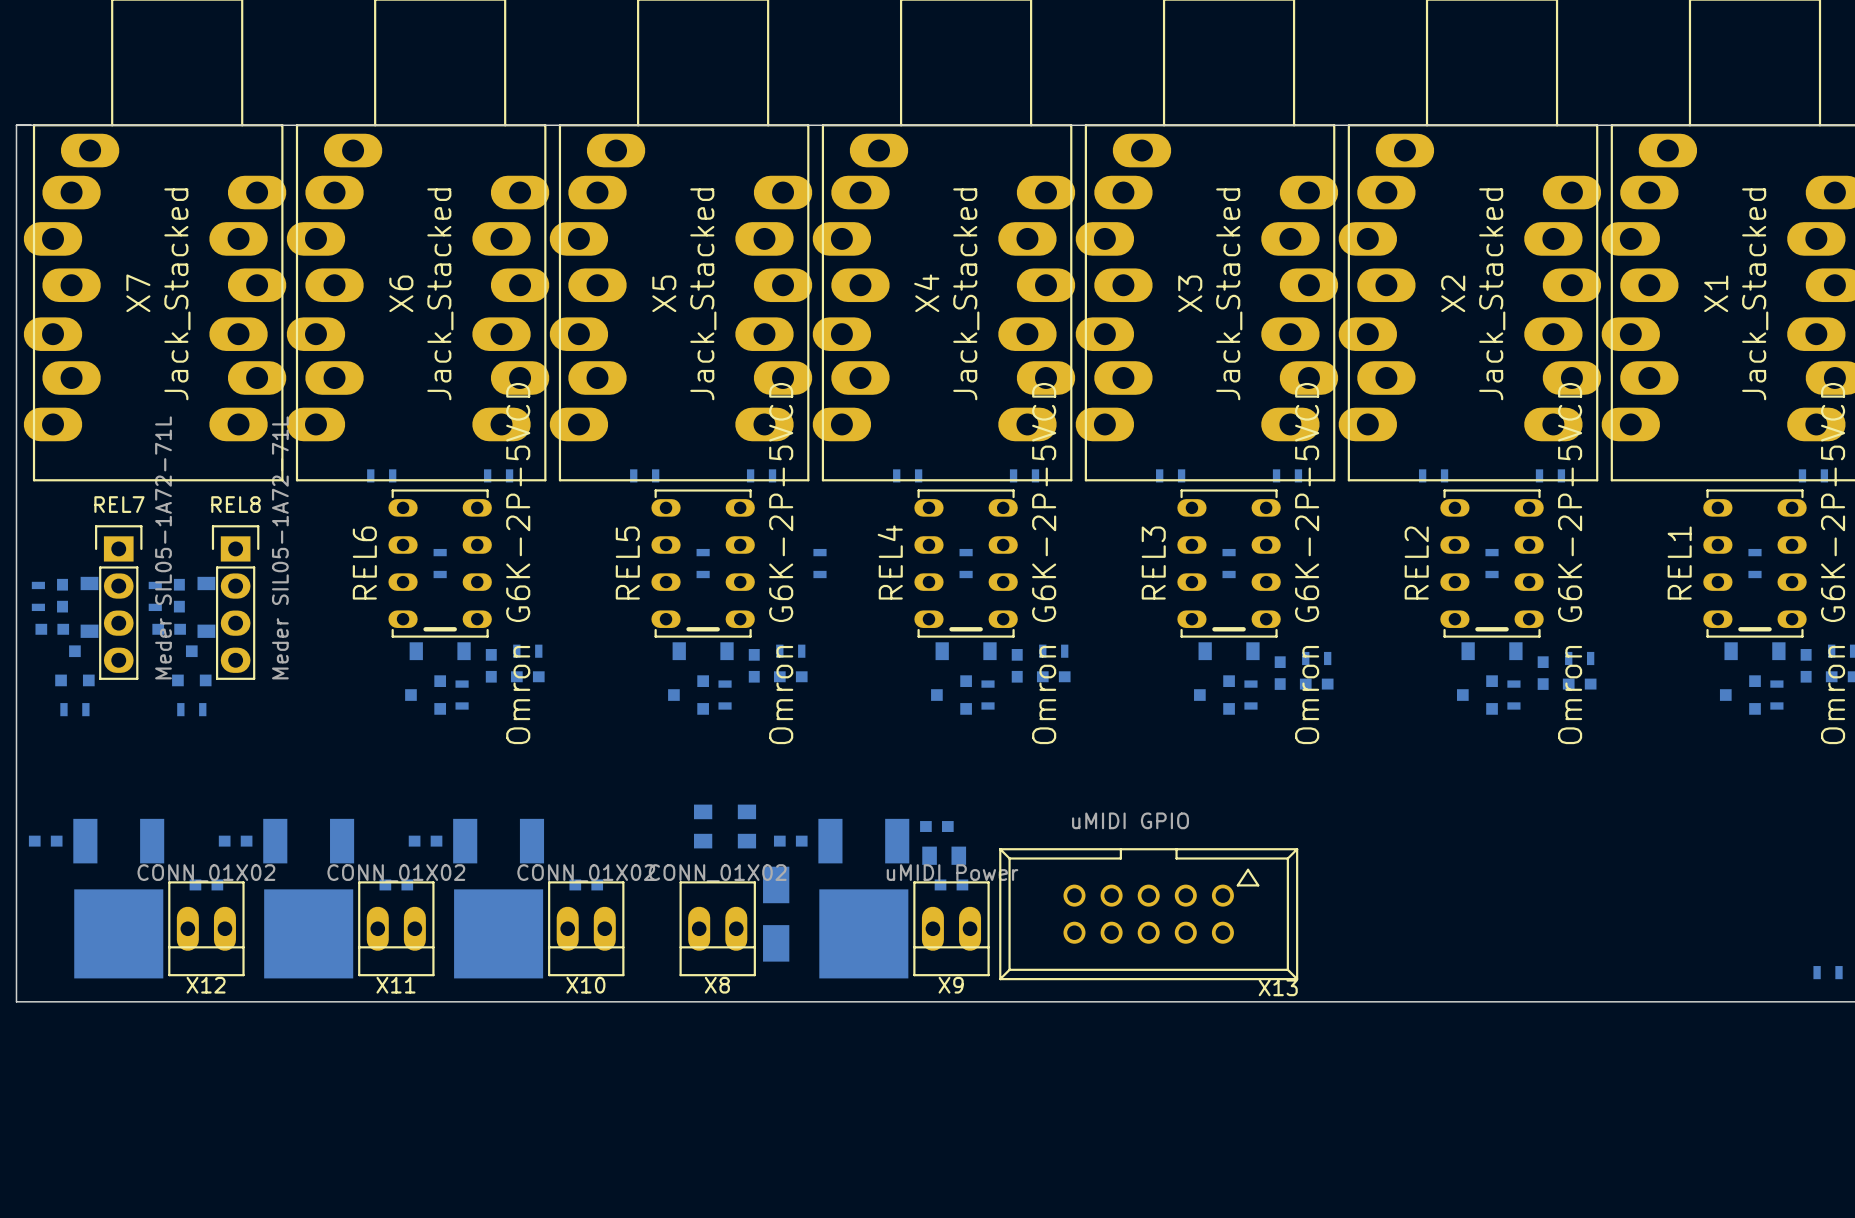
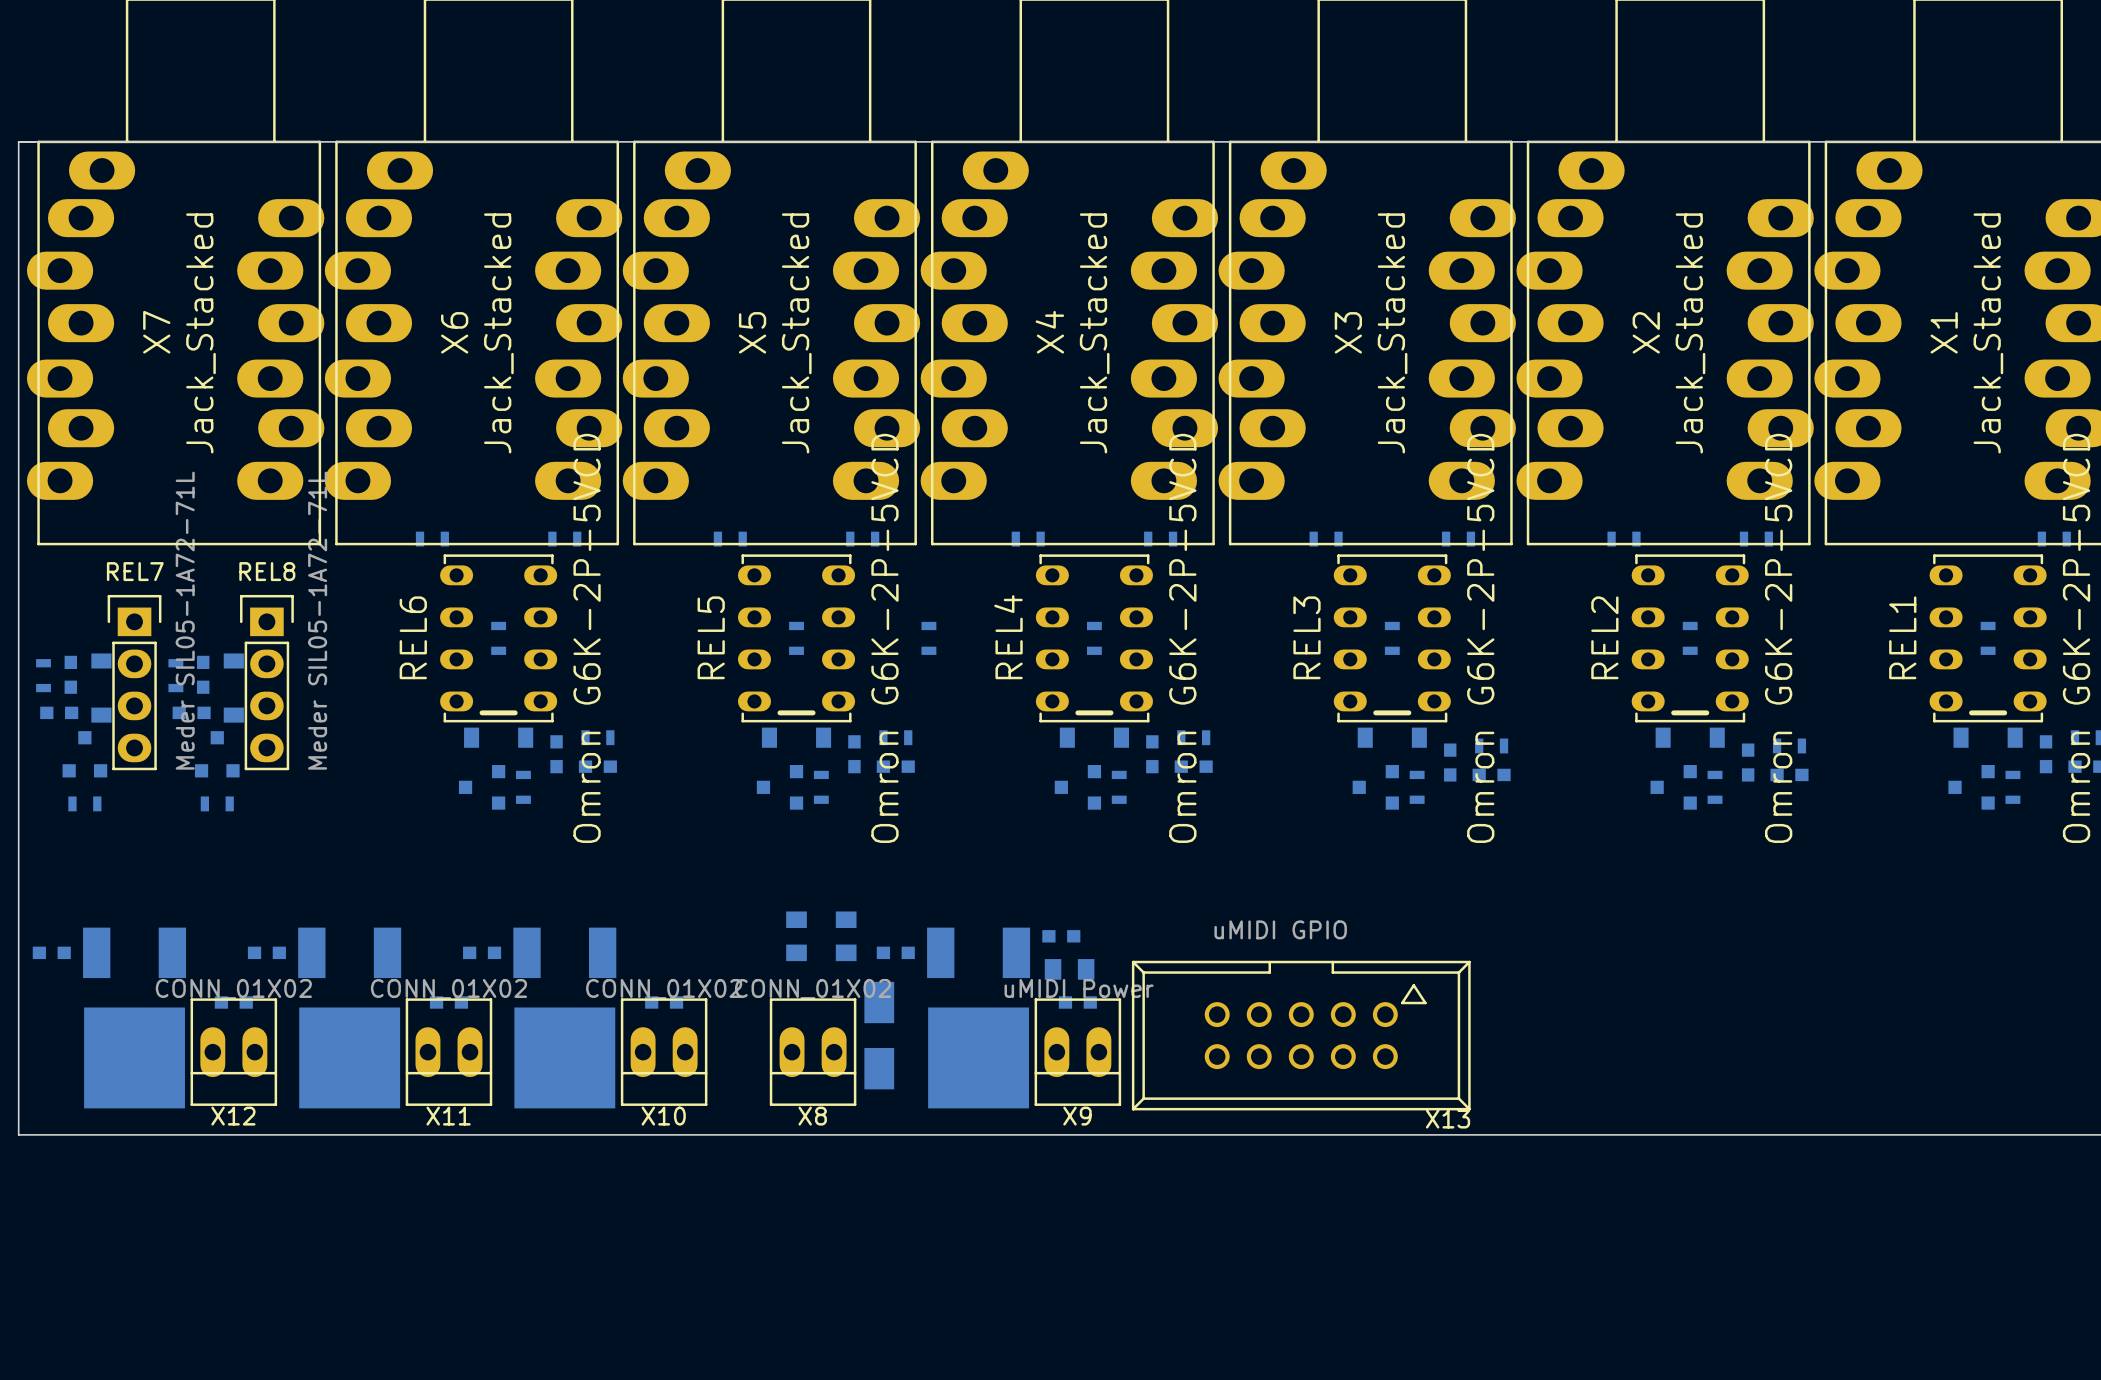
part: (1828, 972) -> none

